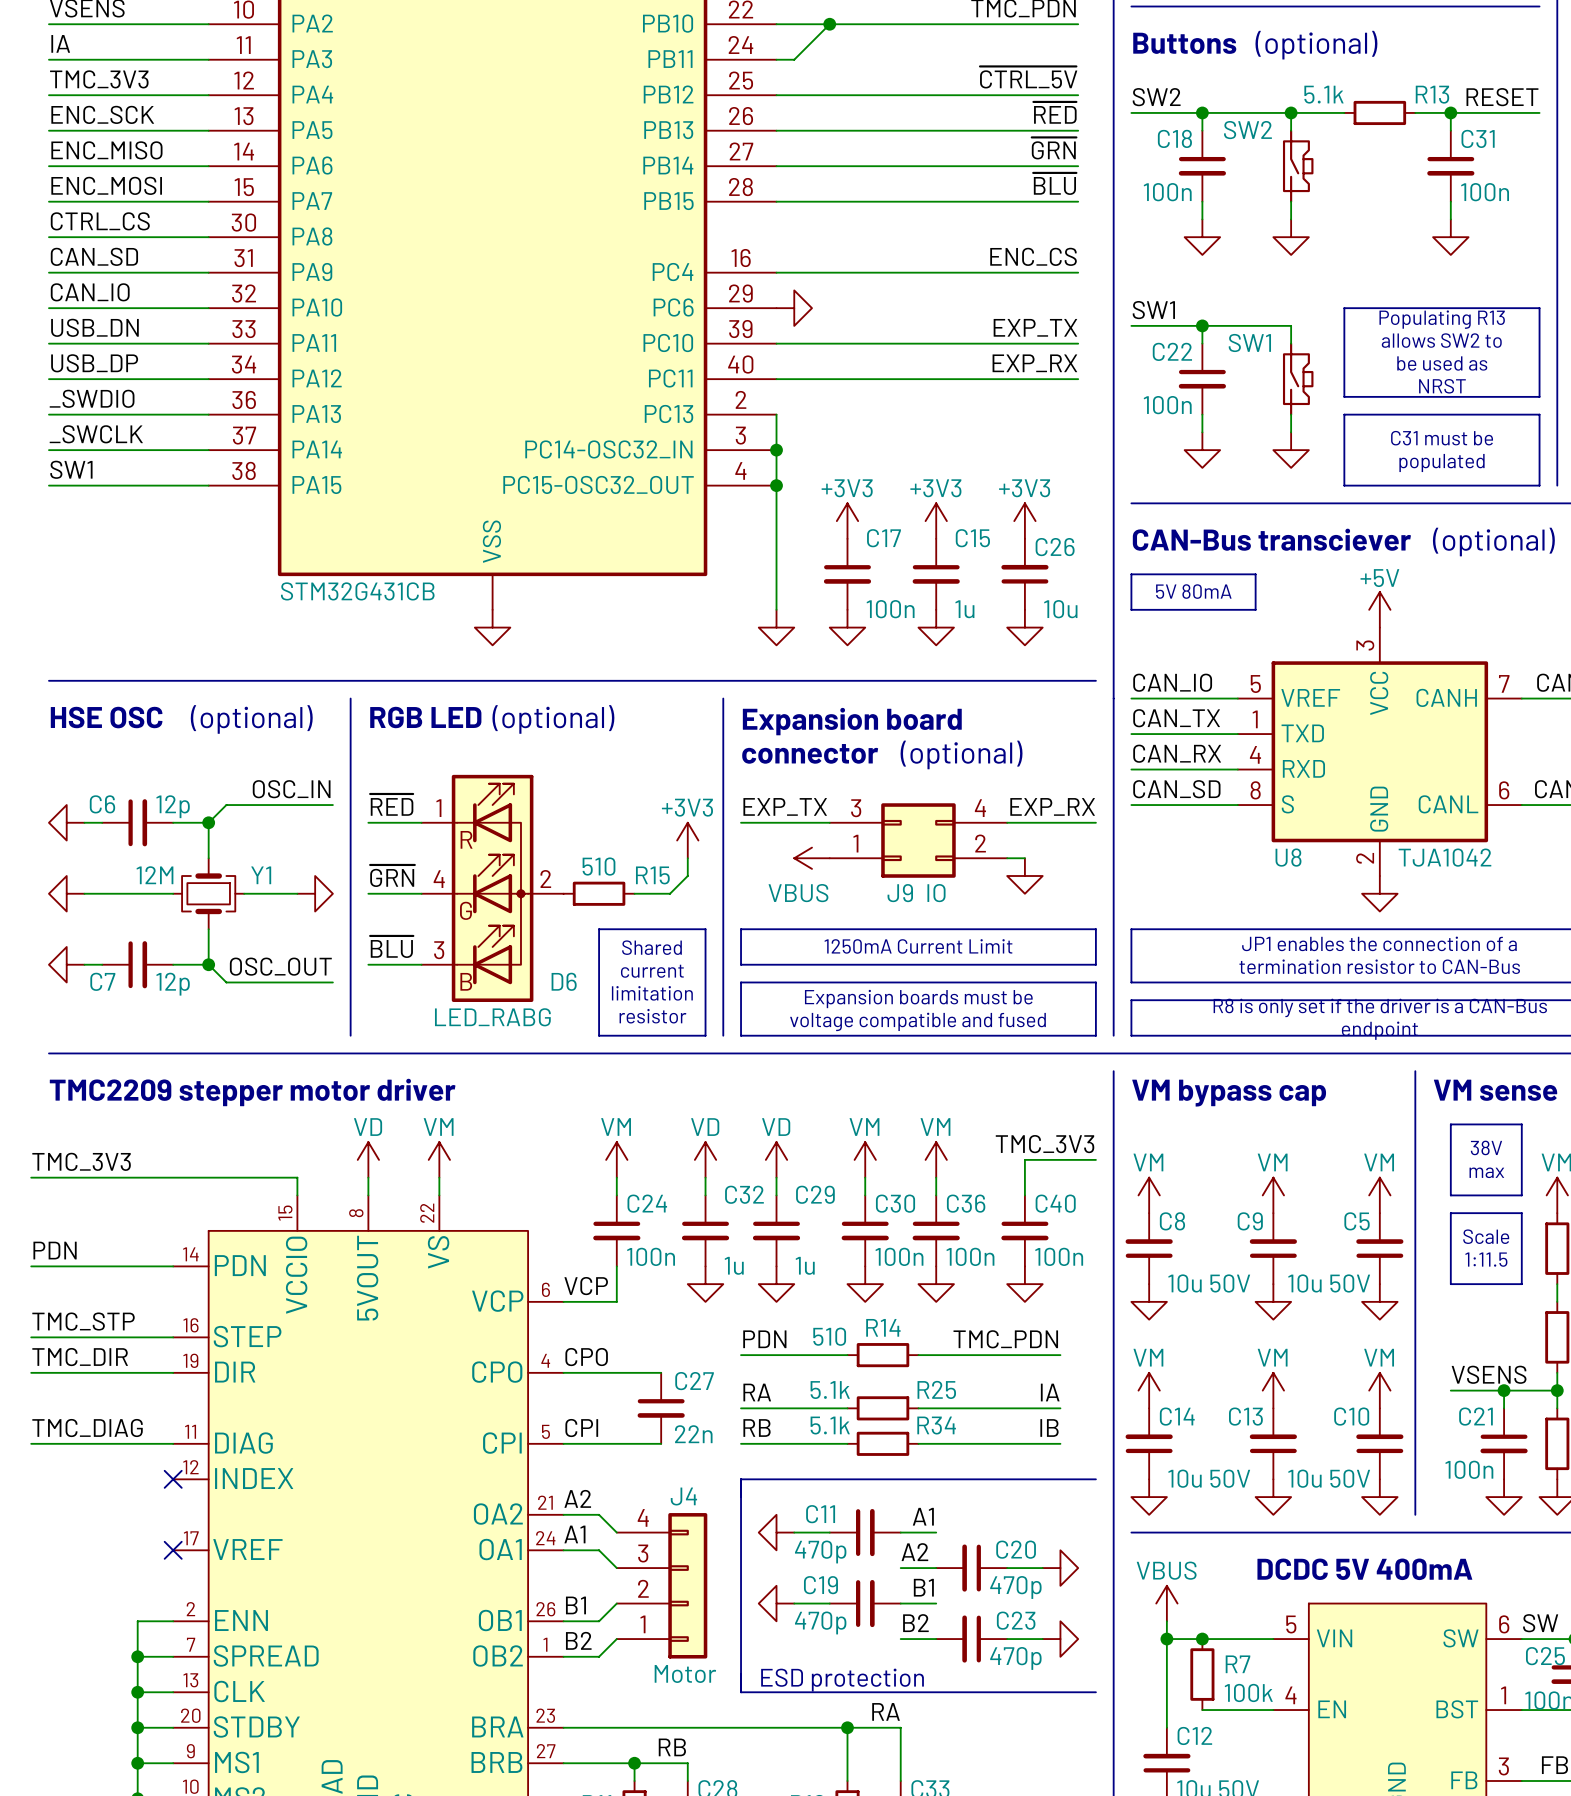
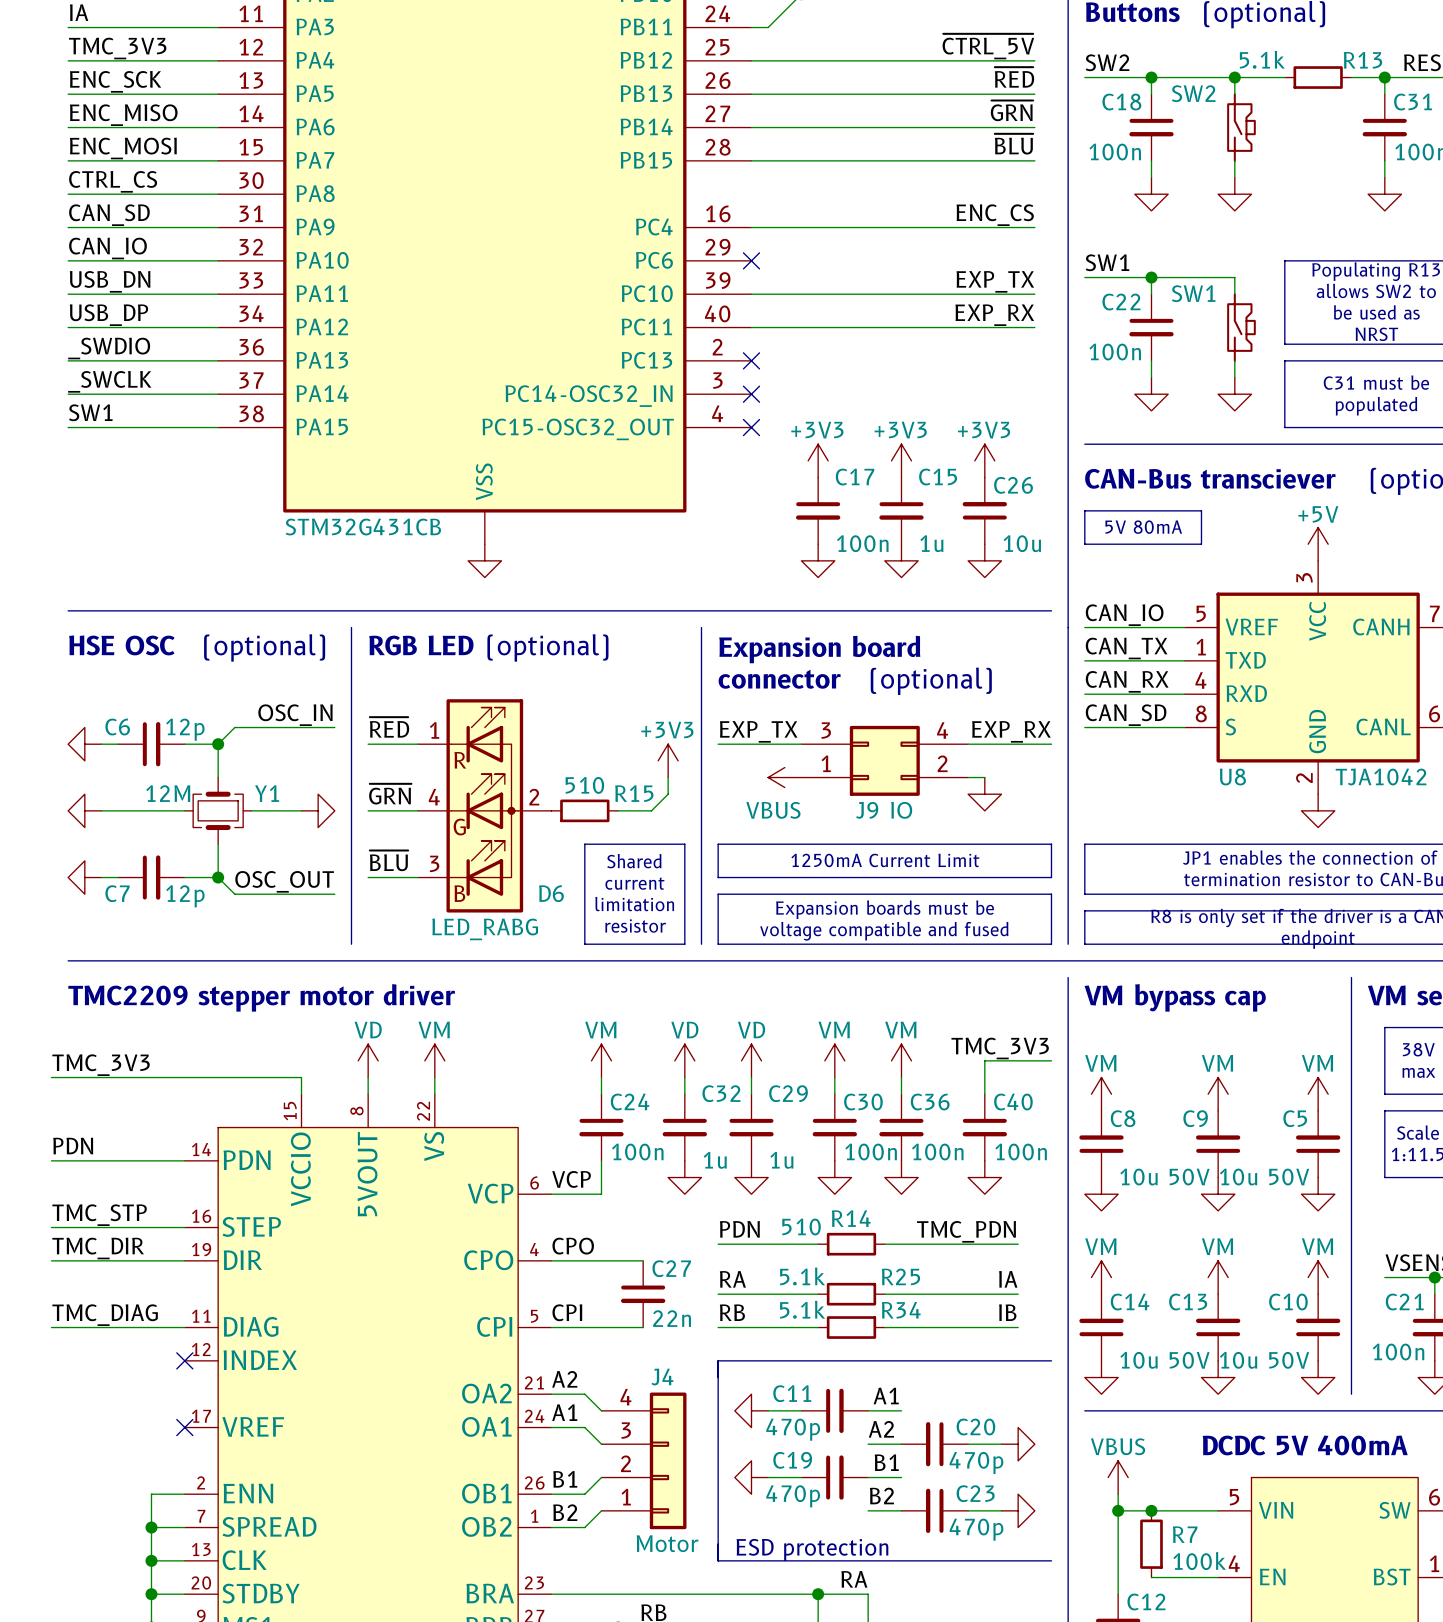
no-connect mark: none -> (751, 260)
power symbol: (794, 308) -> none
wire: (776, 414) (776, 609) -> none
no-connect mark: none -> (751, 360)
junction: (776, 450) -> none
no-connect mark: none -> (751, 394)
junction: (776, 485) -> none
no-connect mark: none -> (751, 427)
power symbol: (776, 627) -> none

